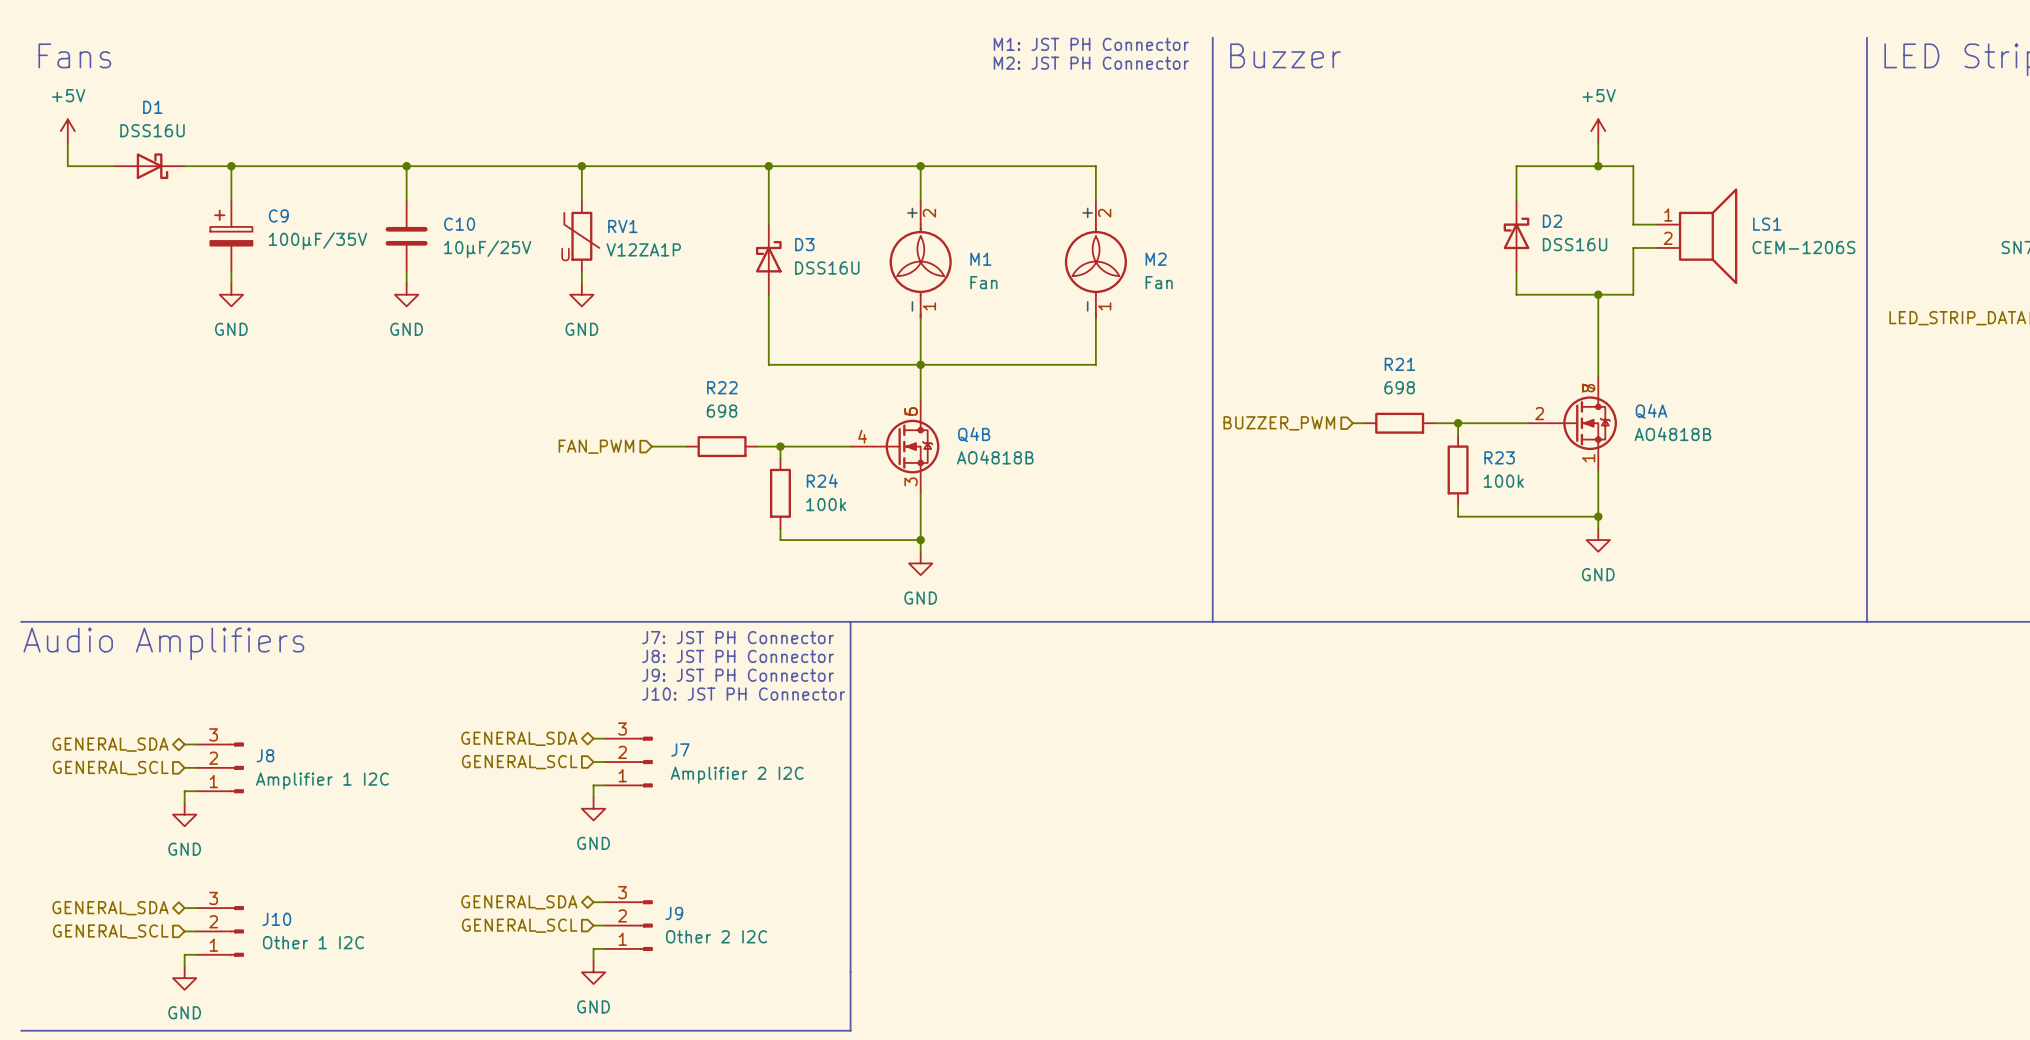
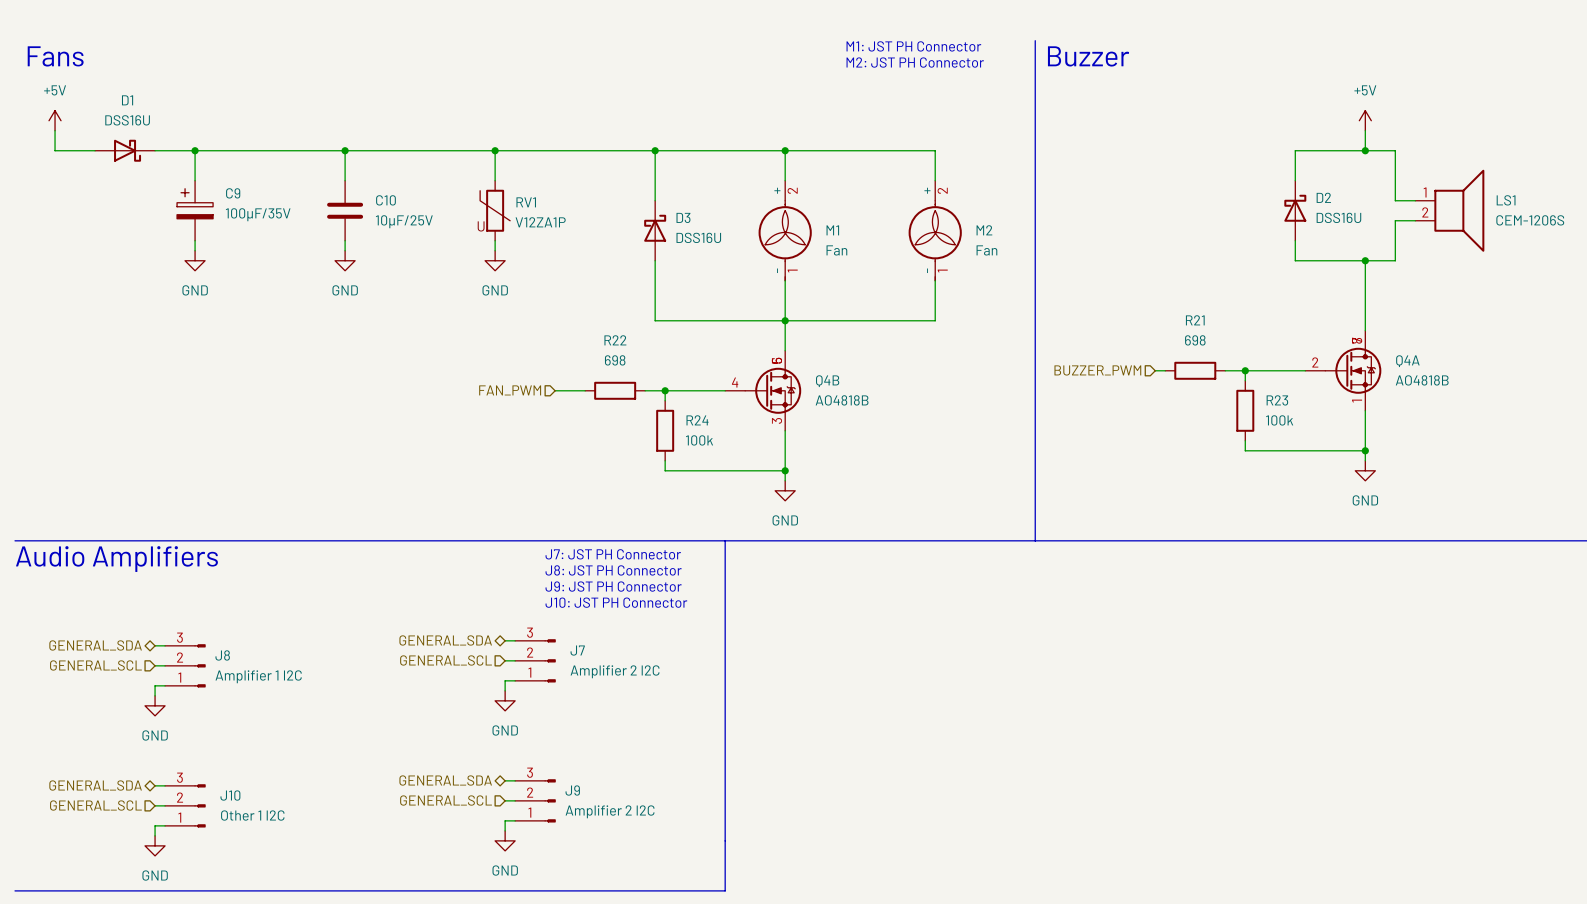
J9 value: Other 2 I2C (716, 936) -> Amplifier 2 I2C (610, 811)

